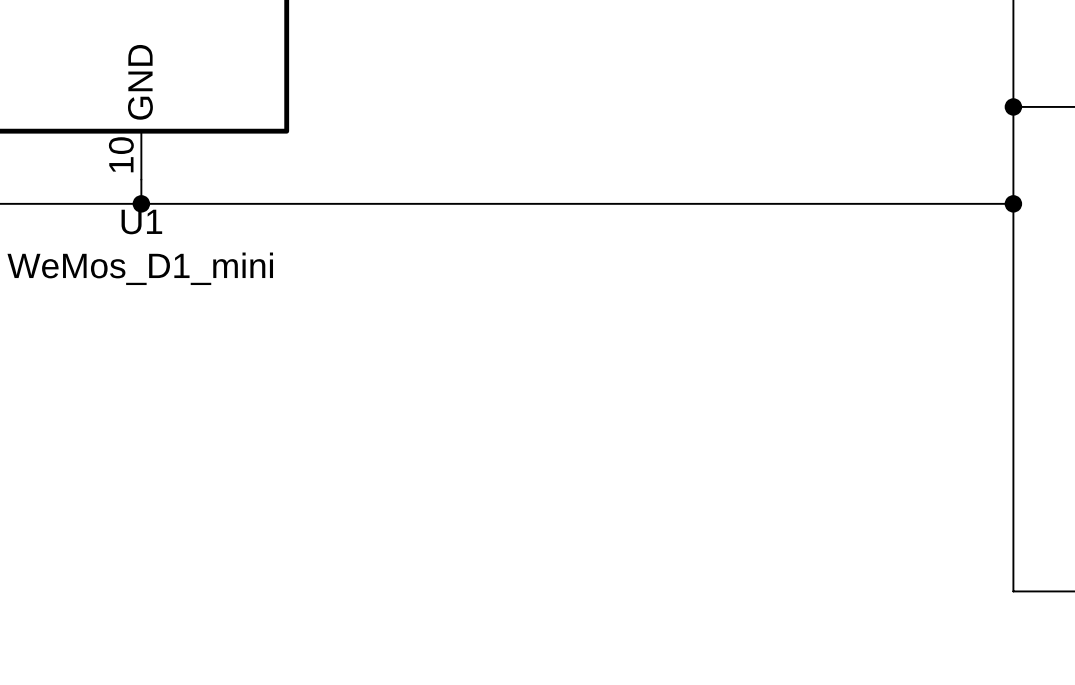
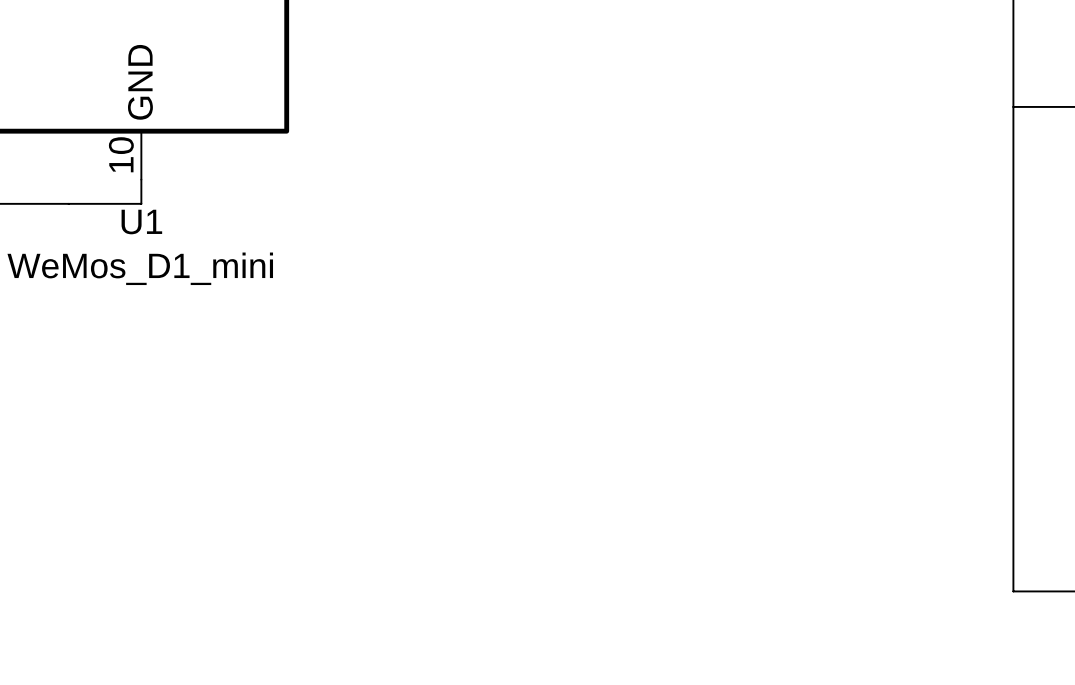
junction: (1013, 106) -> none
wire: (141, 203) (1013, 203) -> none
junction: (141, 203) -> none
junction: (1013, 203) -> none

